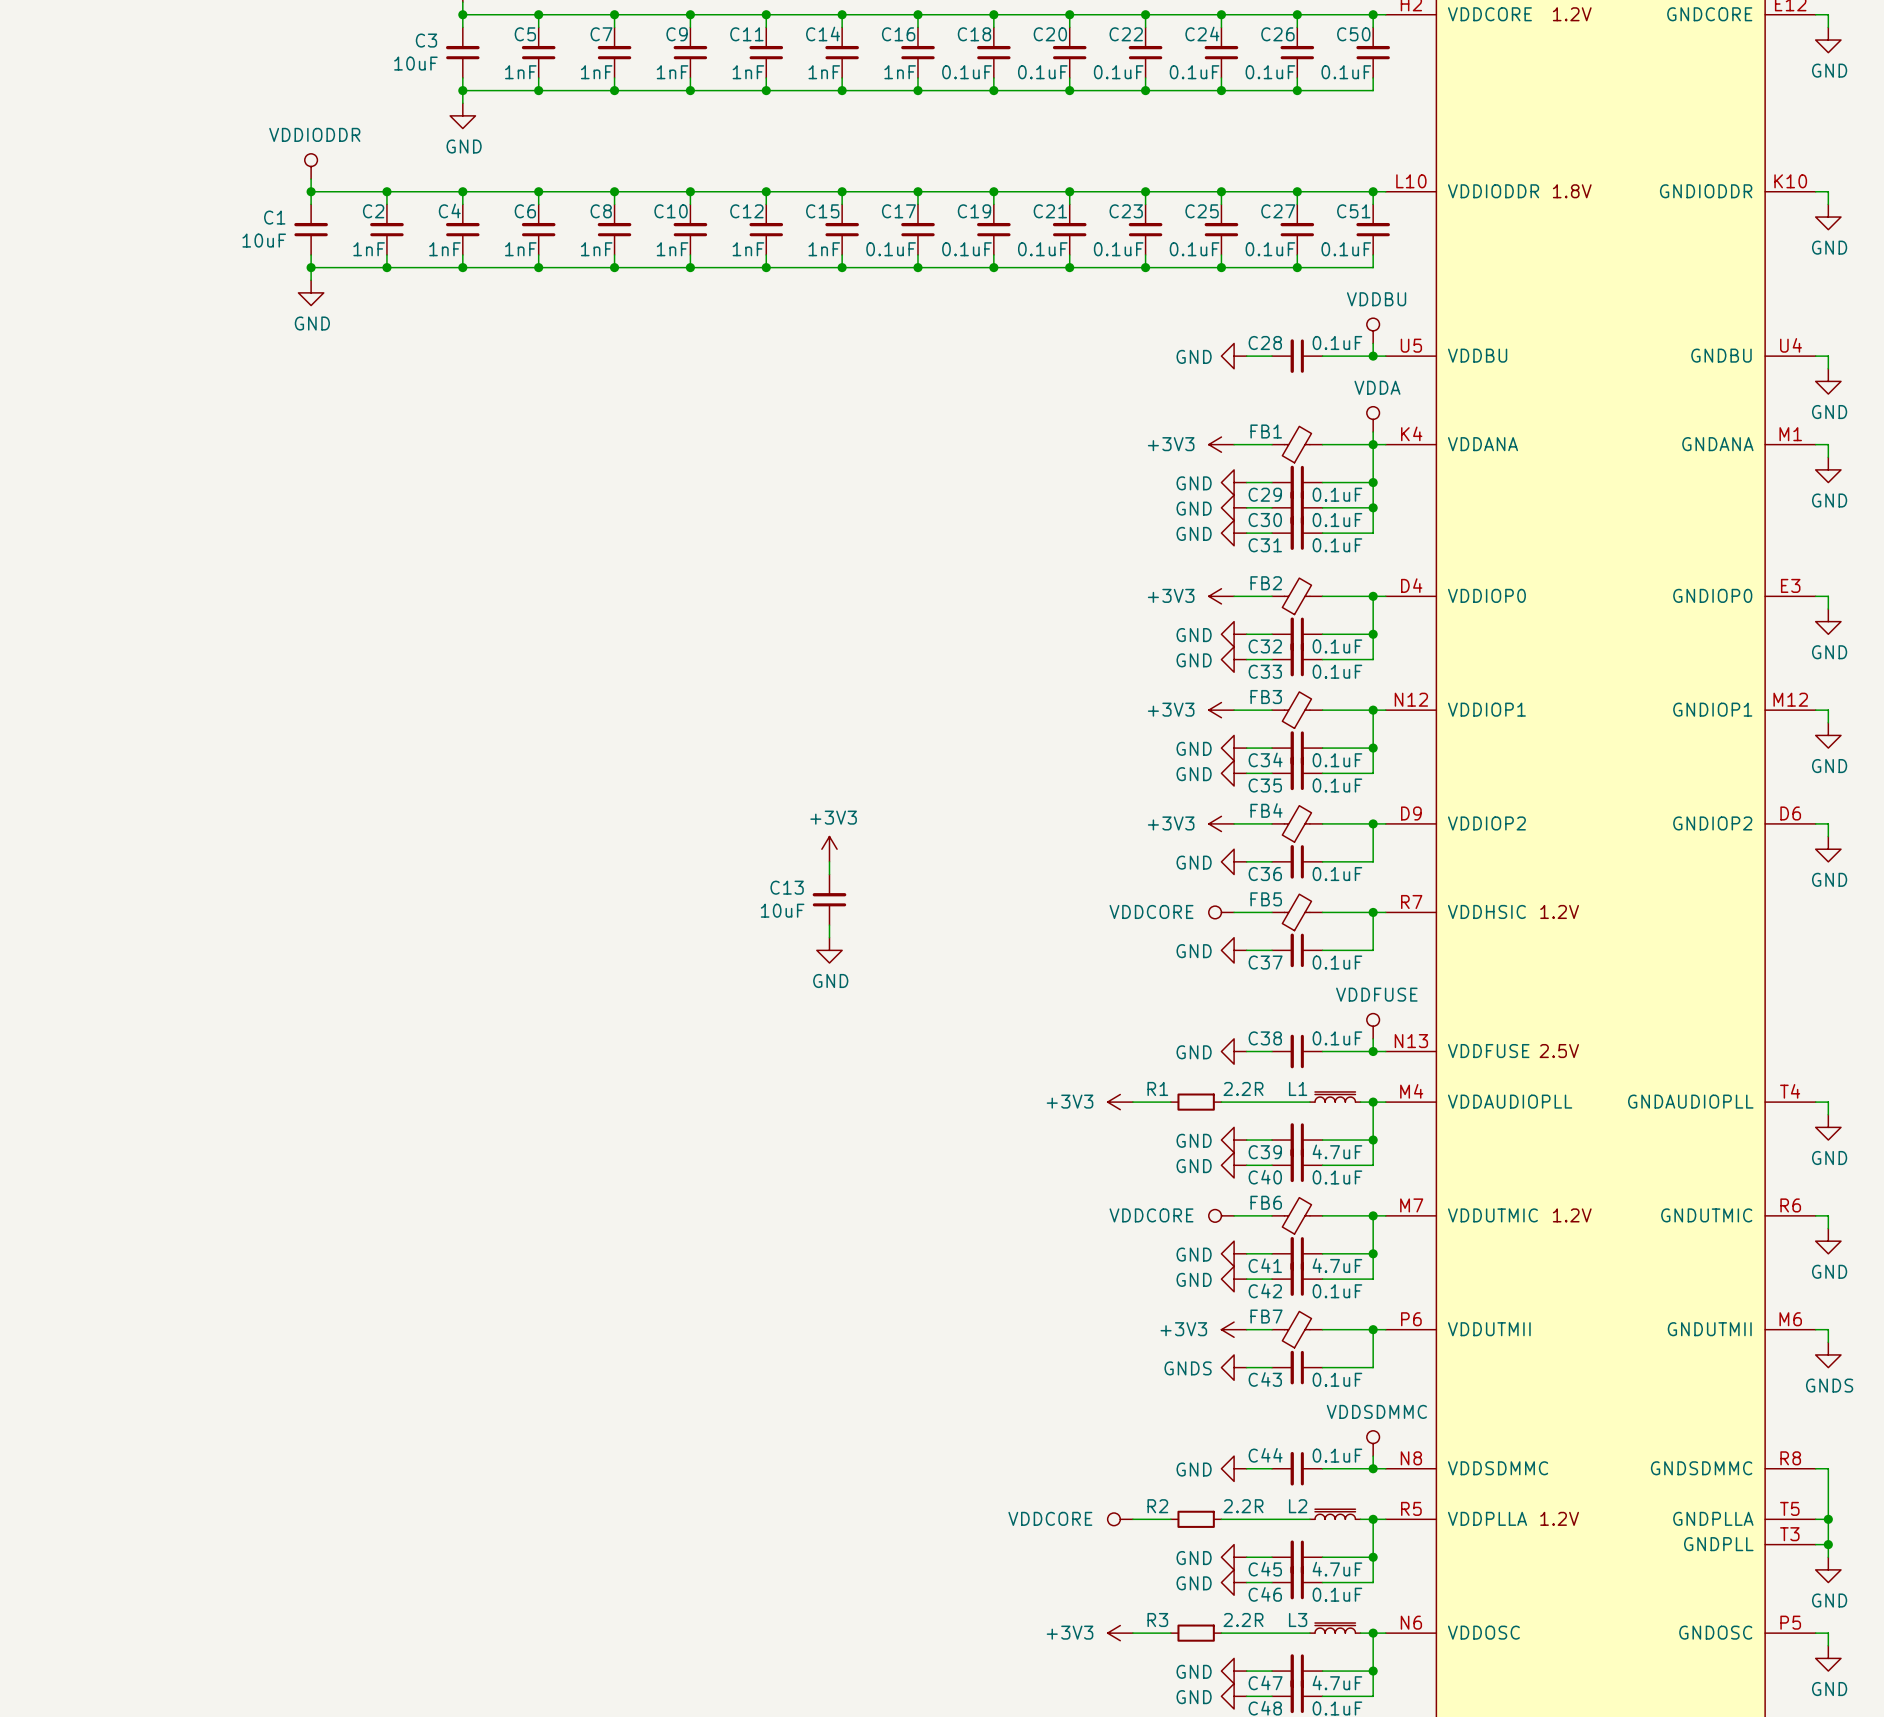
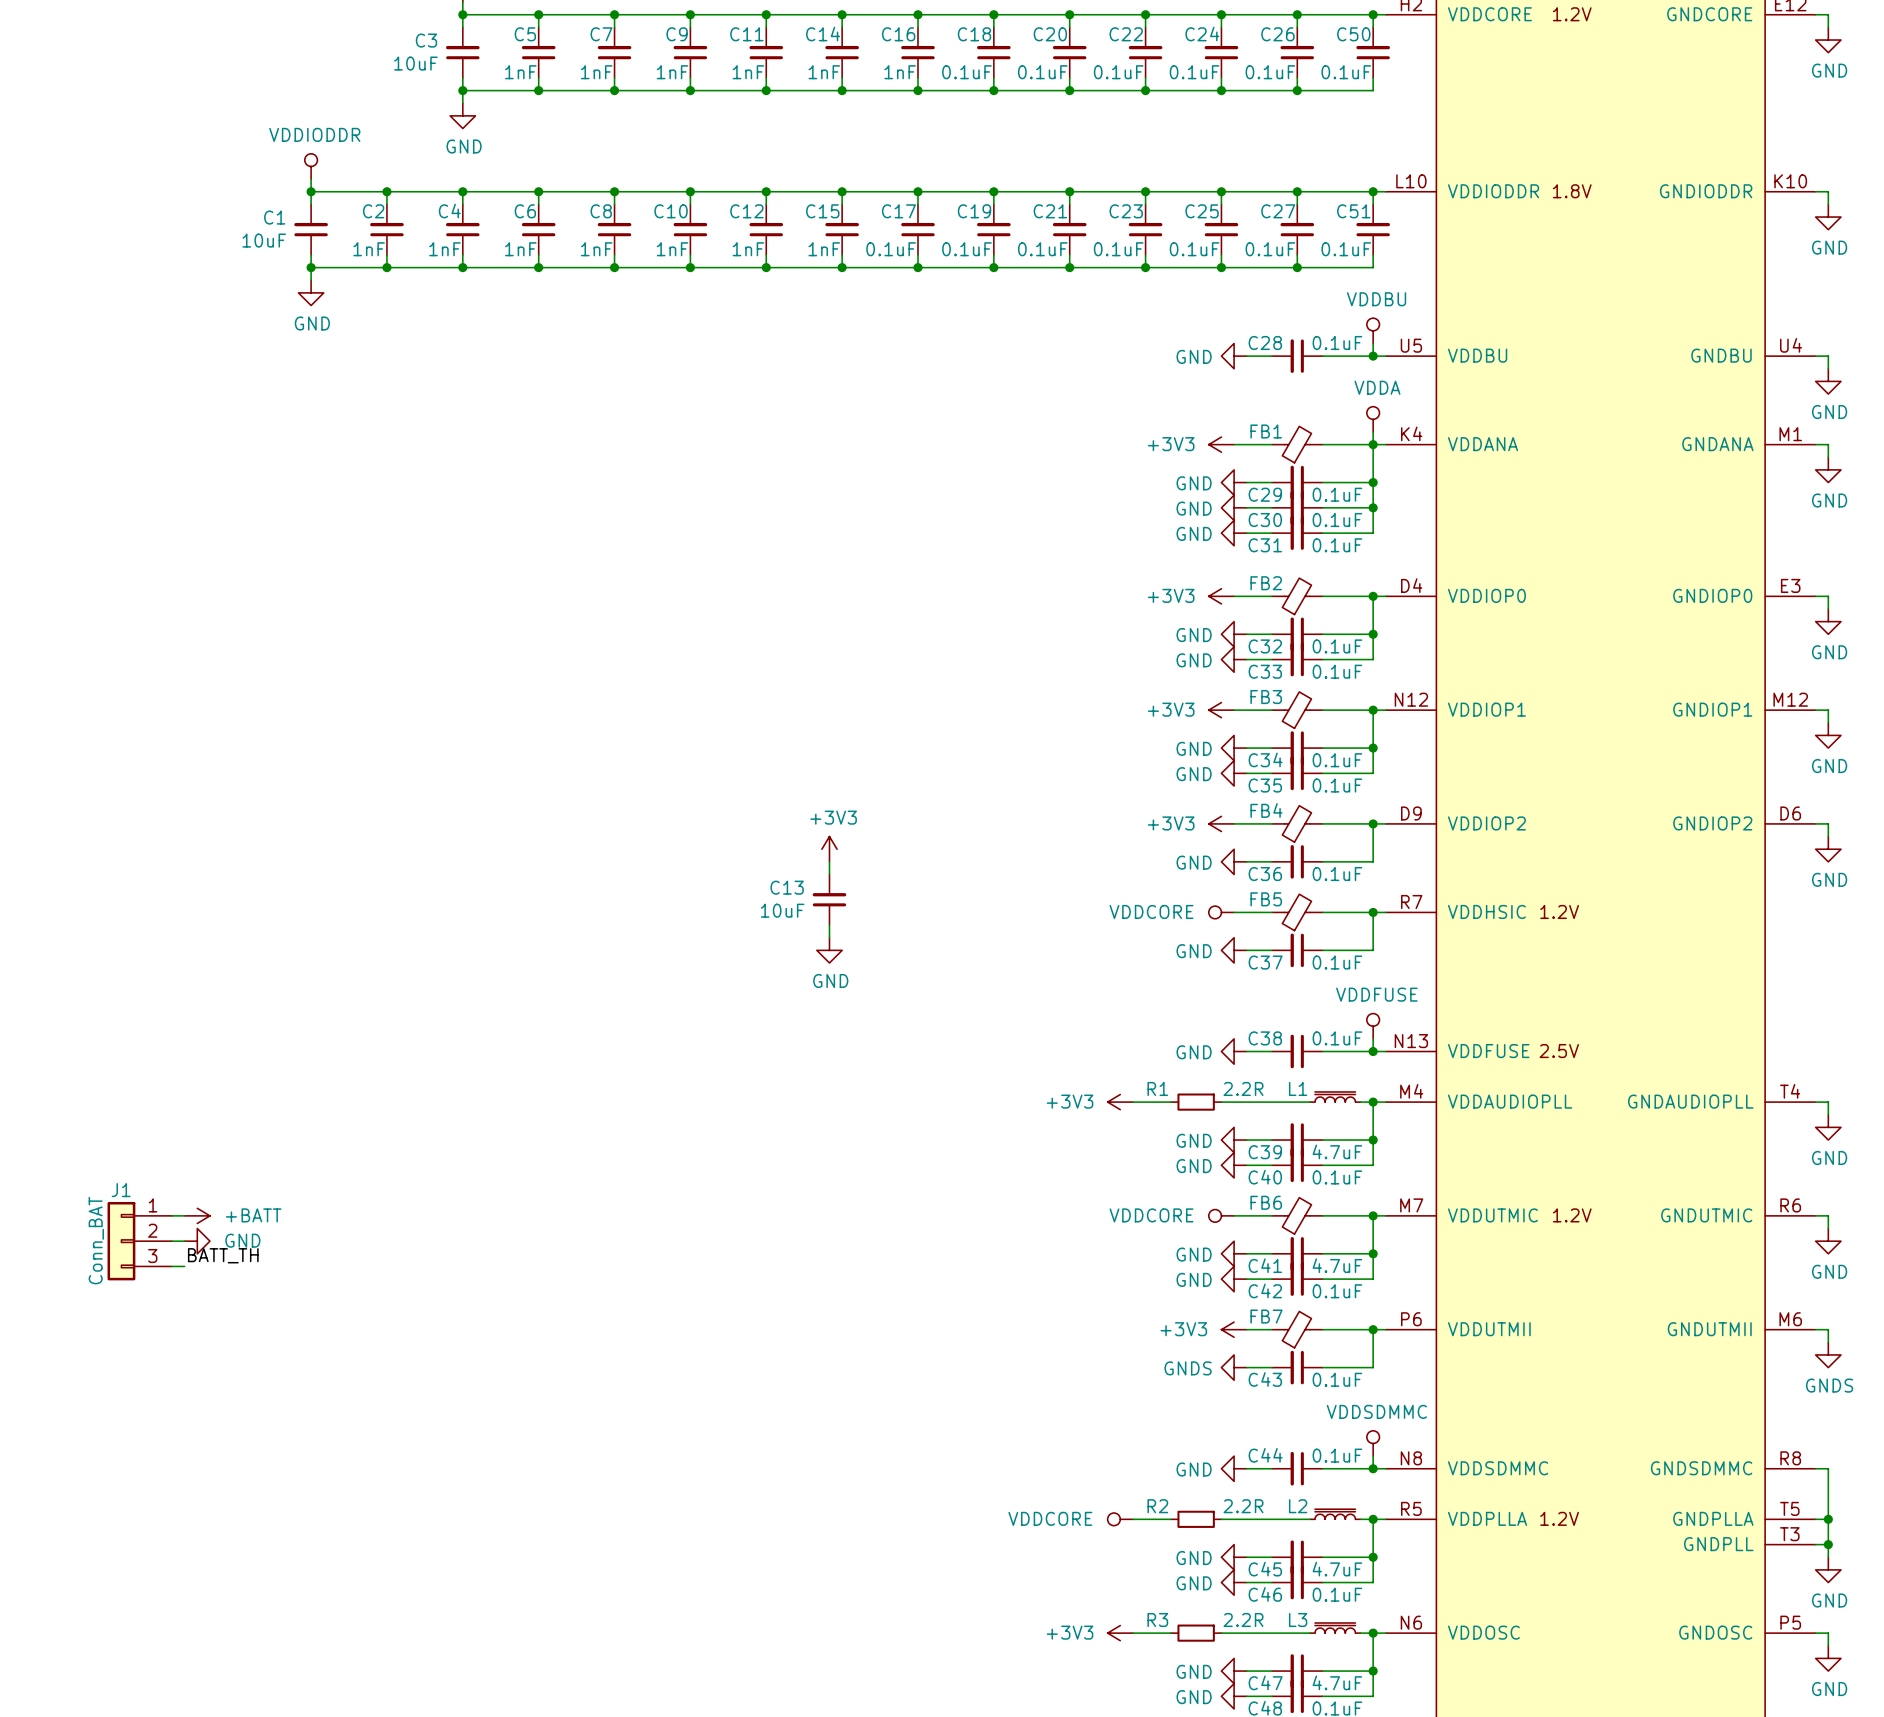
wire: none -> (172, 1215) (184, 1215)
power symbol: none -> +BATT (197, 1215)
J1: none -> Conn_BAT (139, 1241)
wire: none -> (172, 1241) (184, 1241)
power symbol: none -> GND (197, 1241)
label: none -> BATT_TH (223, 1255)
wire: none -> (172, 1266) (184, 1266)

